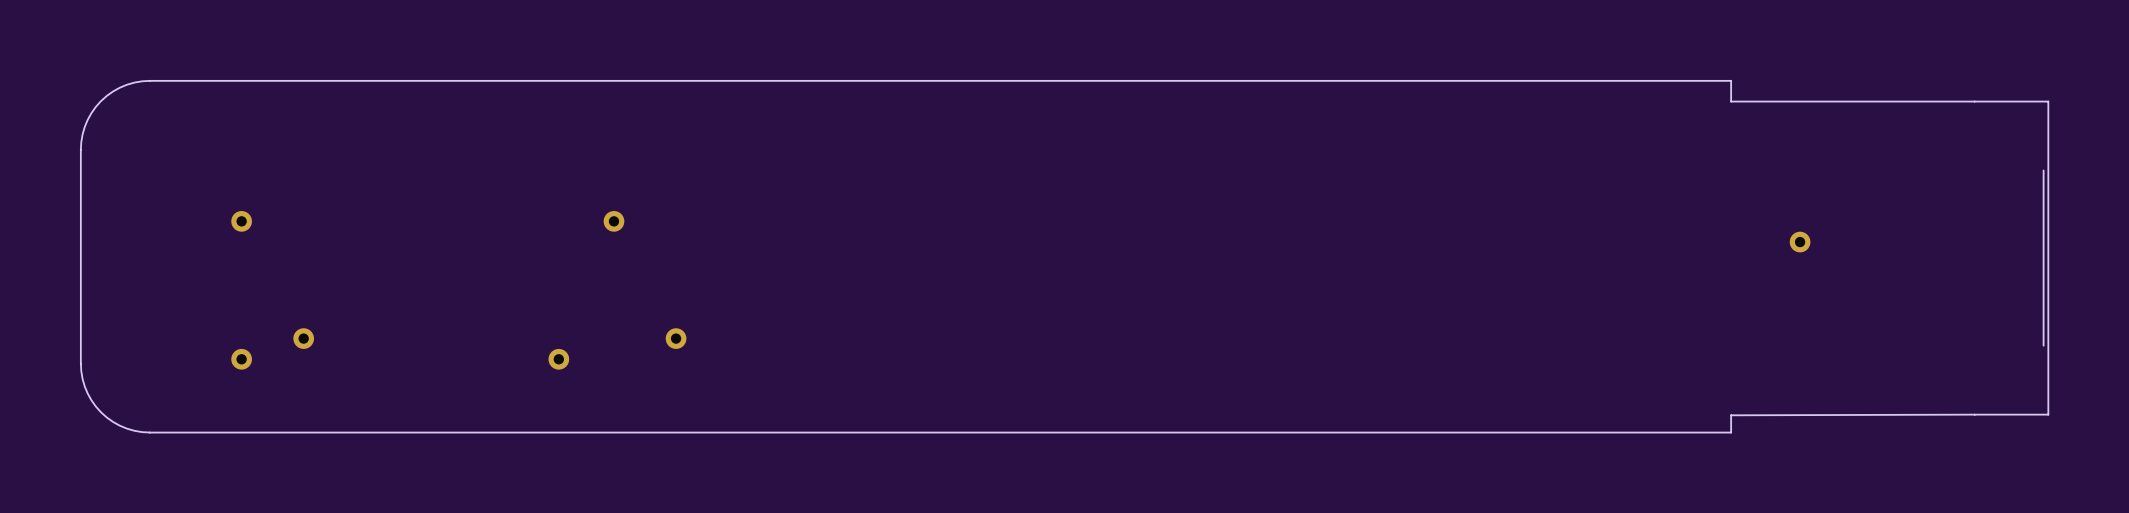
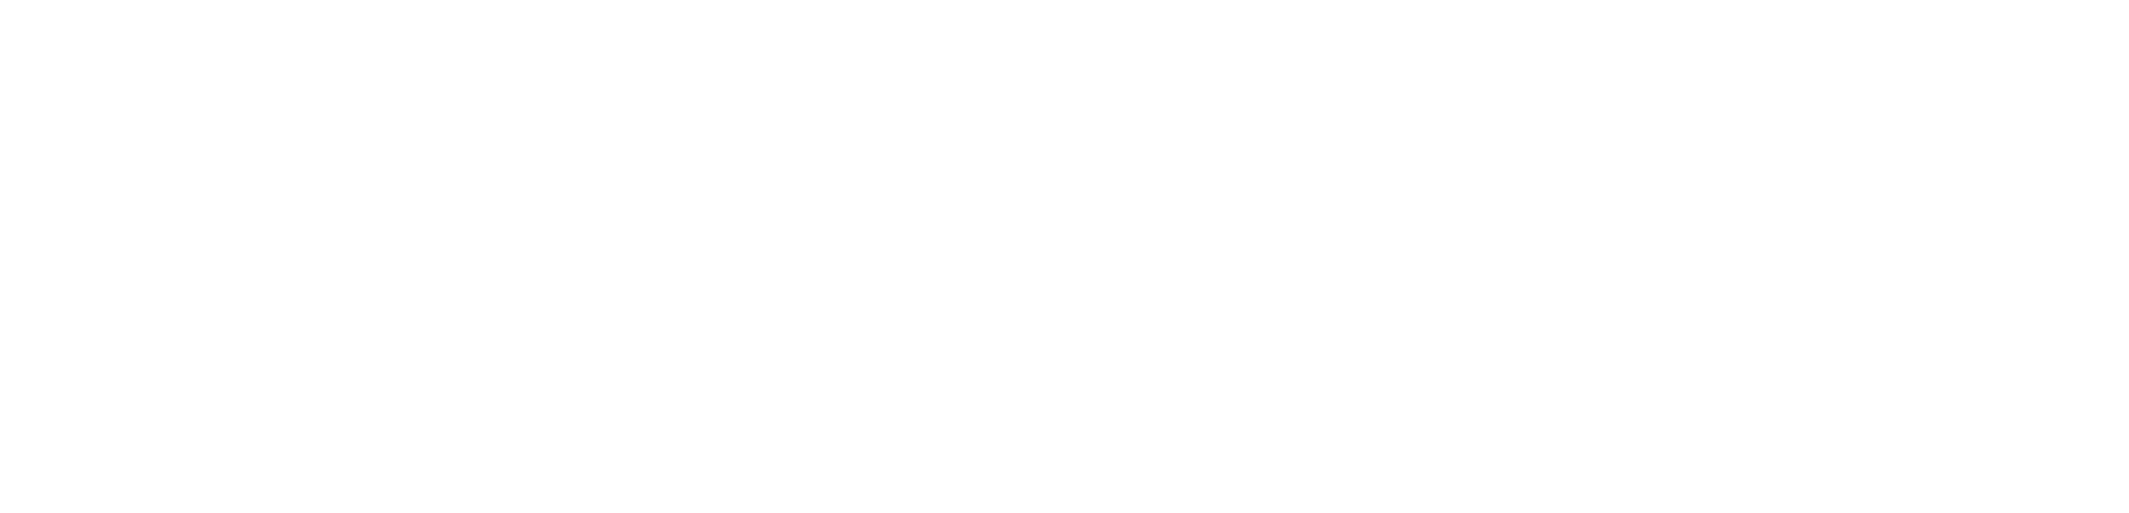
board edge: (1731, 80) (149, 80) (134, 82) (113, 91) (101, 101) (91, 113) (82, 134) (80, 149) (80, 363) (82, 378) (91, 400) (106, 417) (127, 428) (149, 432) (1731, 432) (1731, 415) (2048, 414) (2048, 101) (1731, 101) (1731, 80) -> none
board edge: (2043, 170) (2043, 345) -> none
via: (241, 221) -> none
via: (613, 221) -> none
via: (1800, 242) -> none
via: (303, 338) -> none
via: (676, 338) -> none
via: (241, 359) -> none
via: (558, 359) -> none

